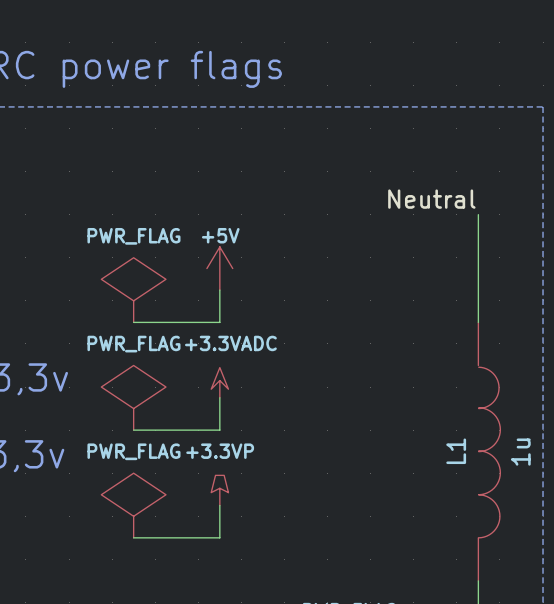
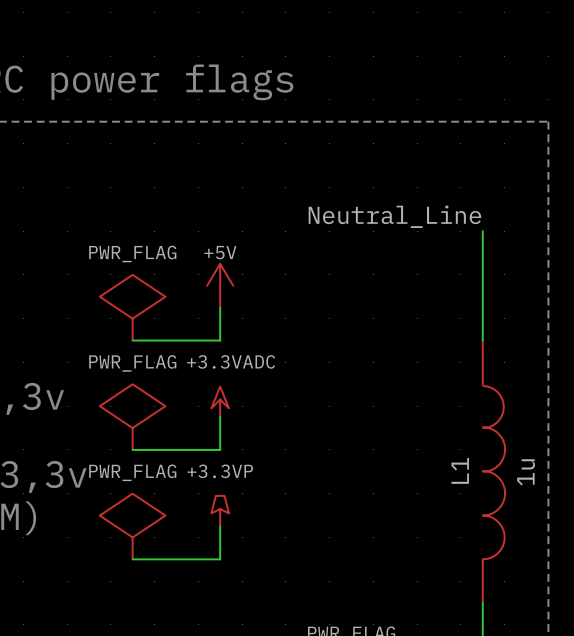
label: Neutral (431, 199) -> Neutral_Line (394, 216)

